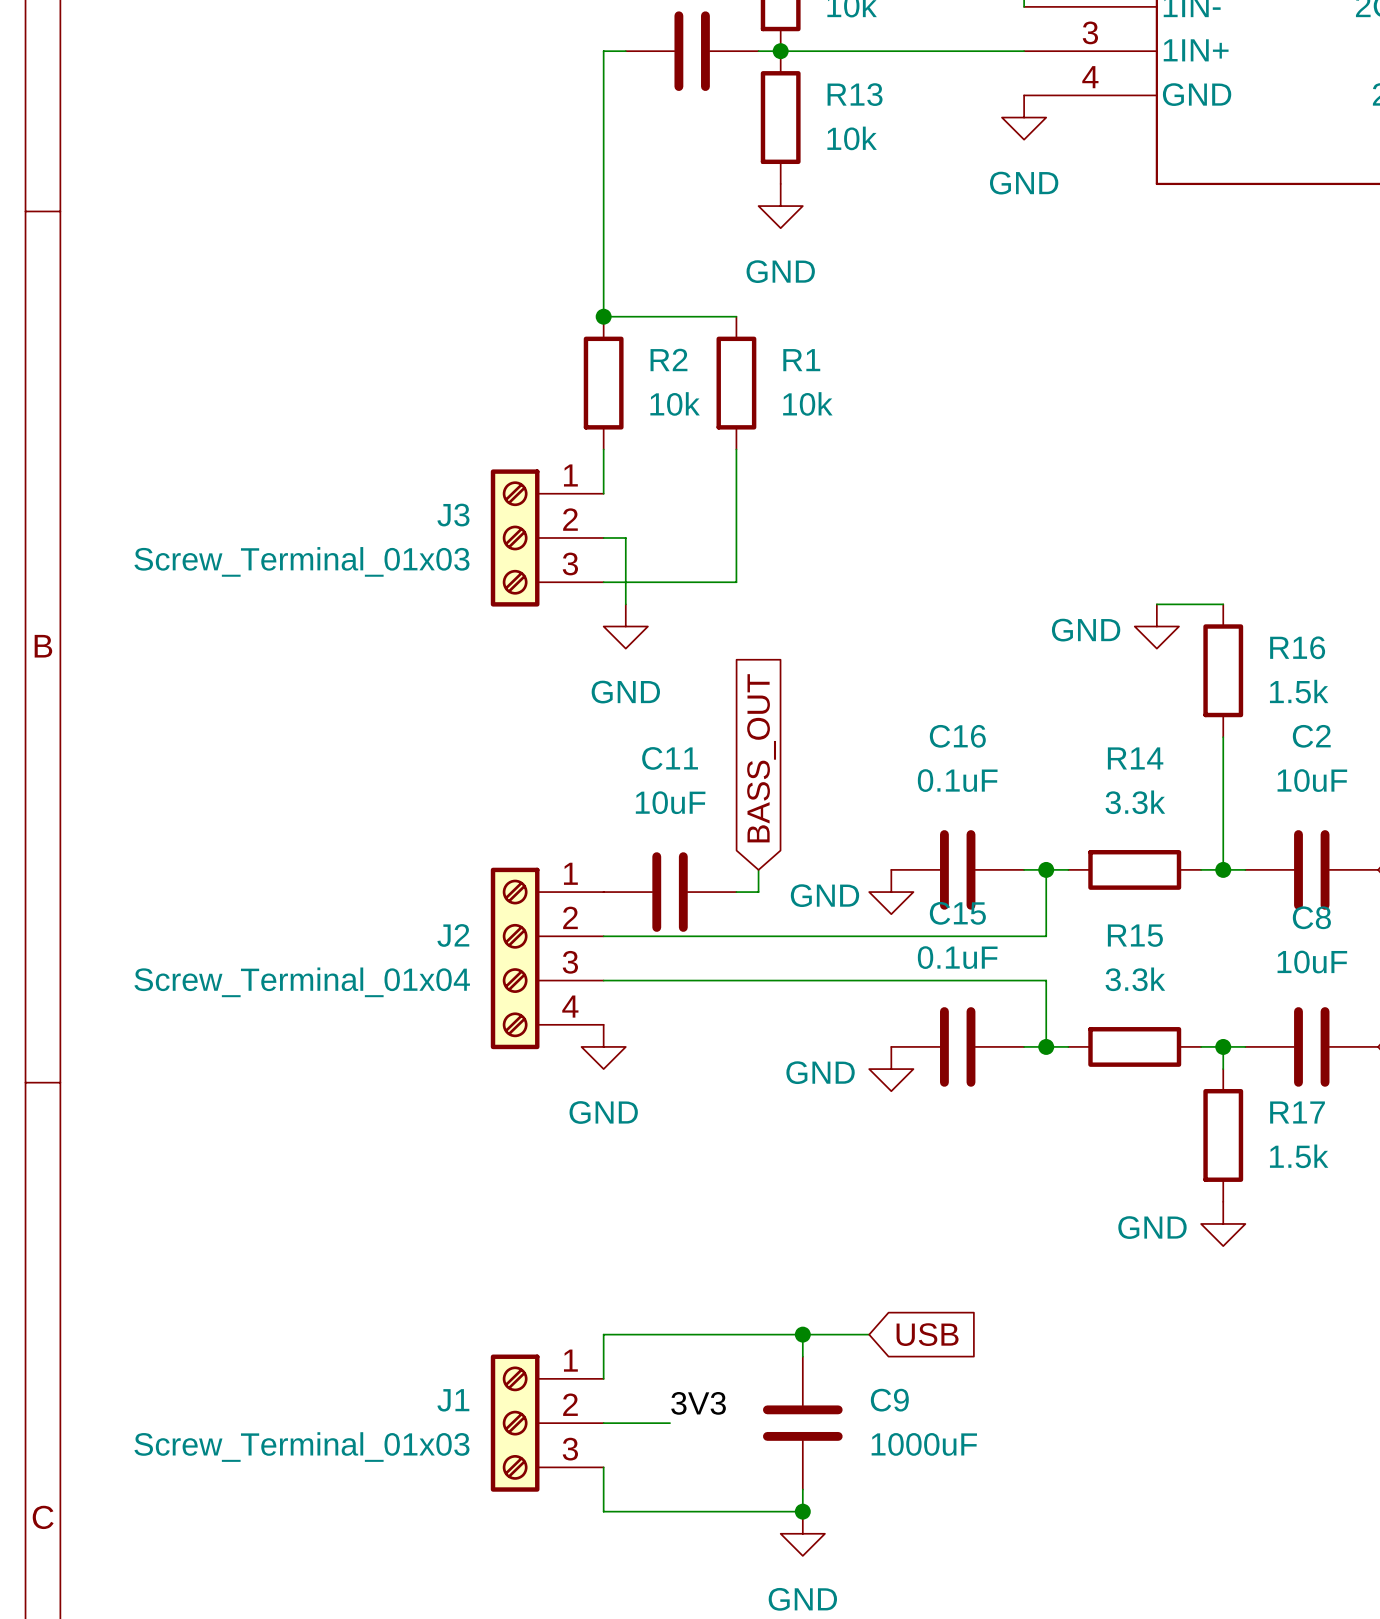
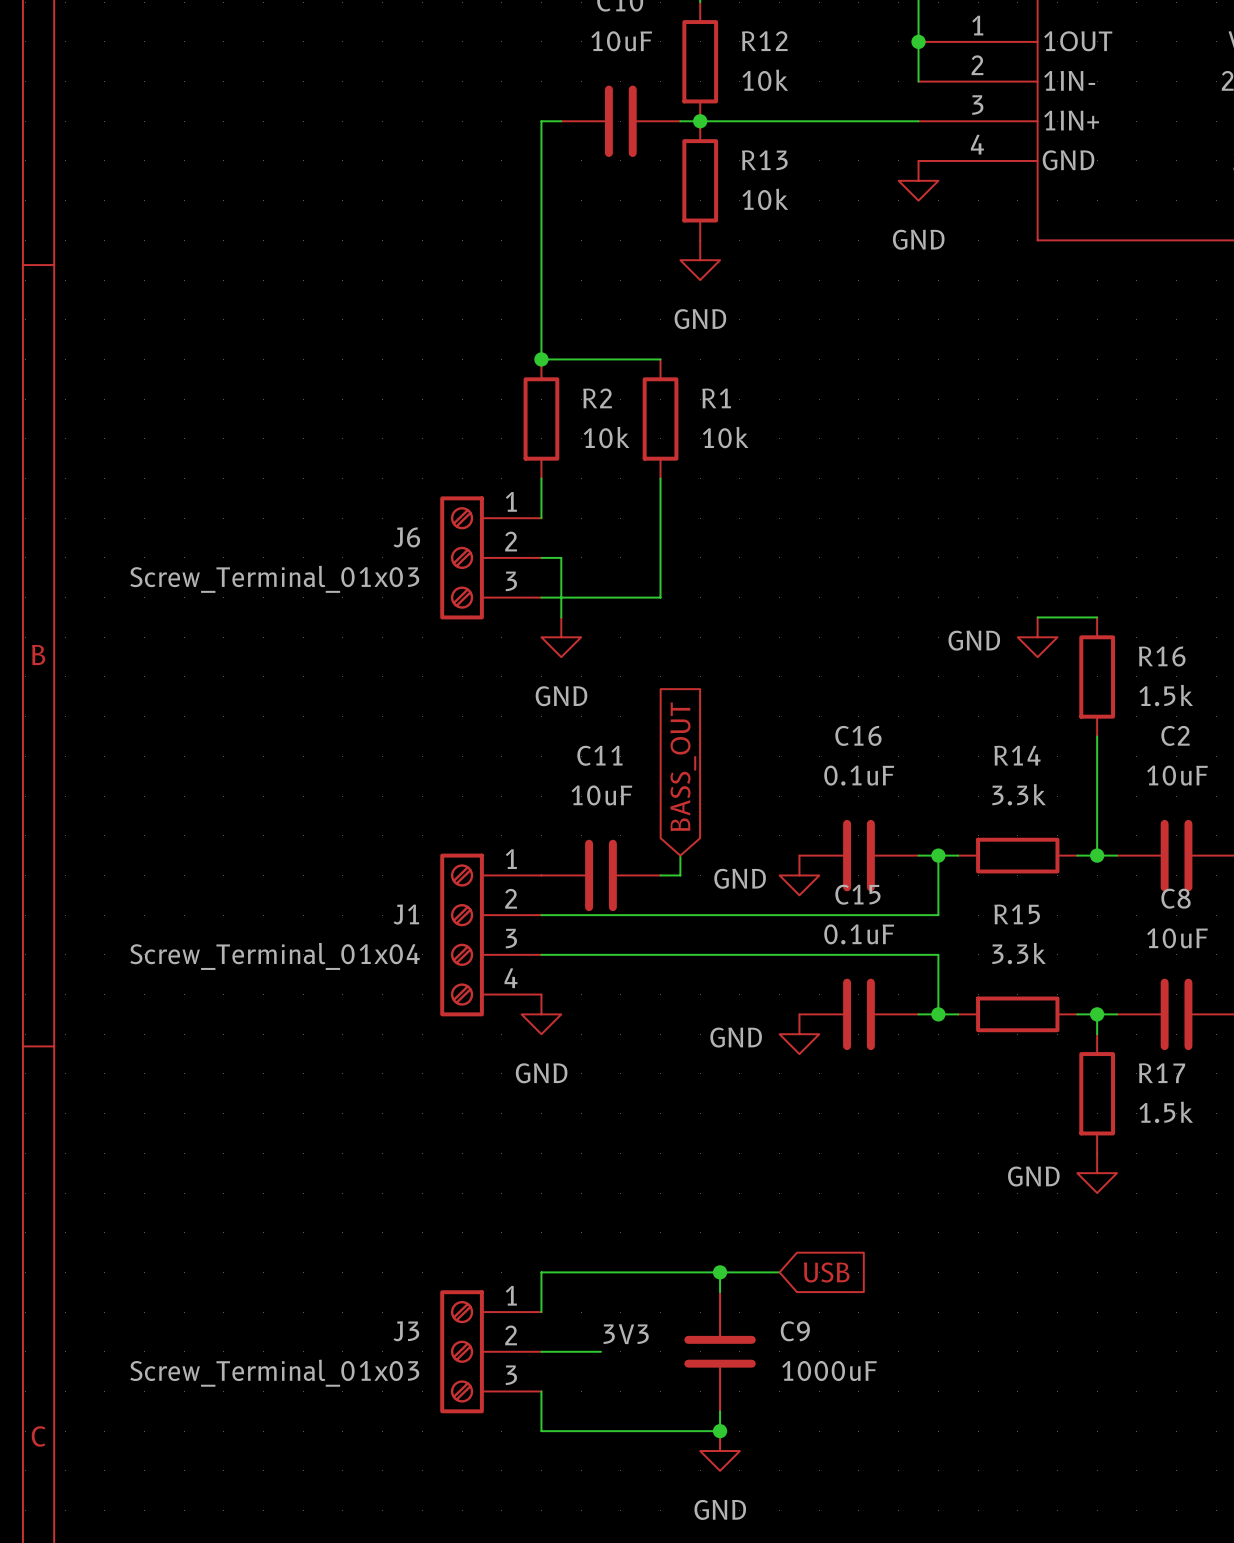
J3 name: J3 (453, 515) -> J6 (406, 537)
J2 name: J2 (453, 935) -> J1 (406, 914)
J1 name: J1 (453, 1400) -> J3 (406, 1331)

